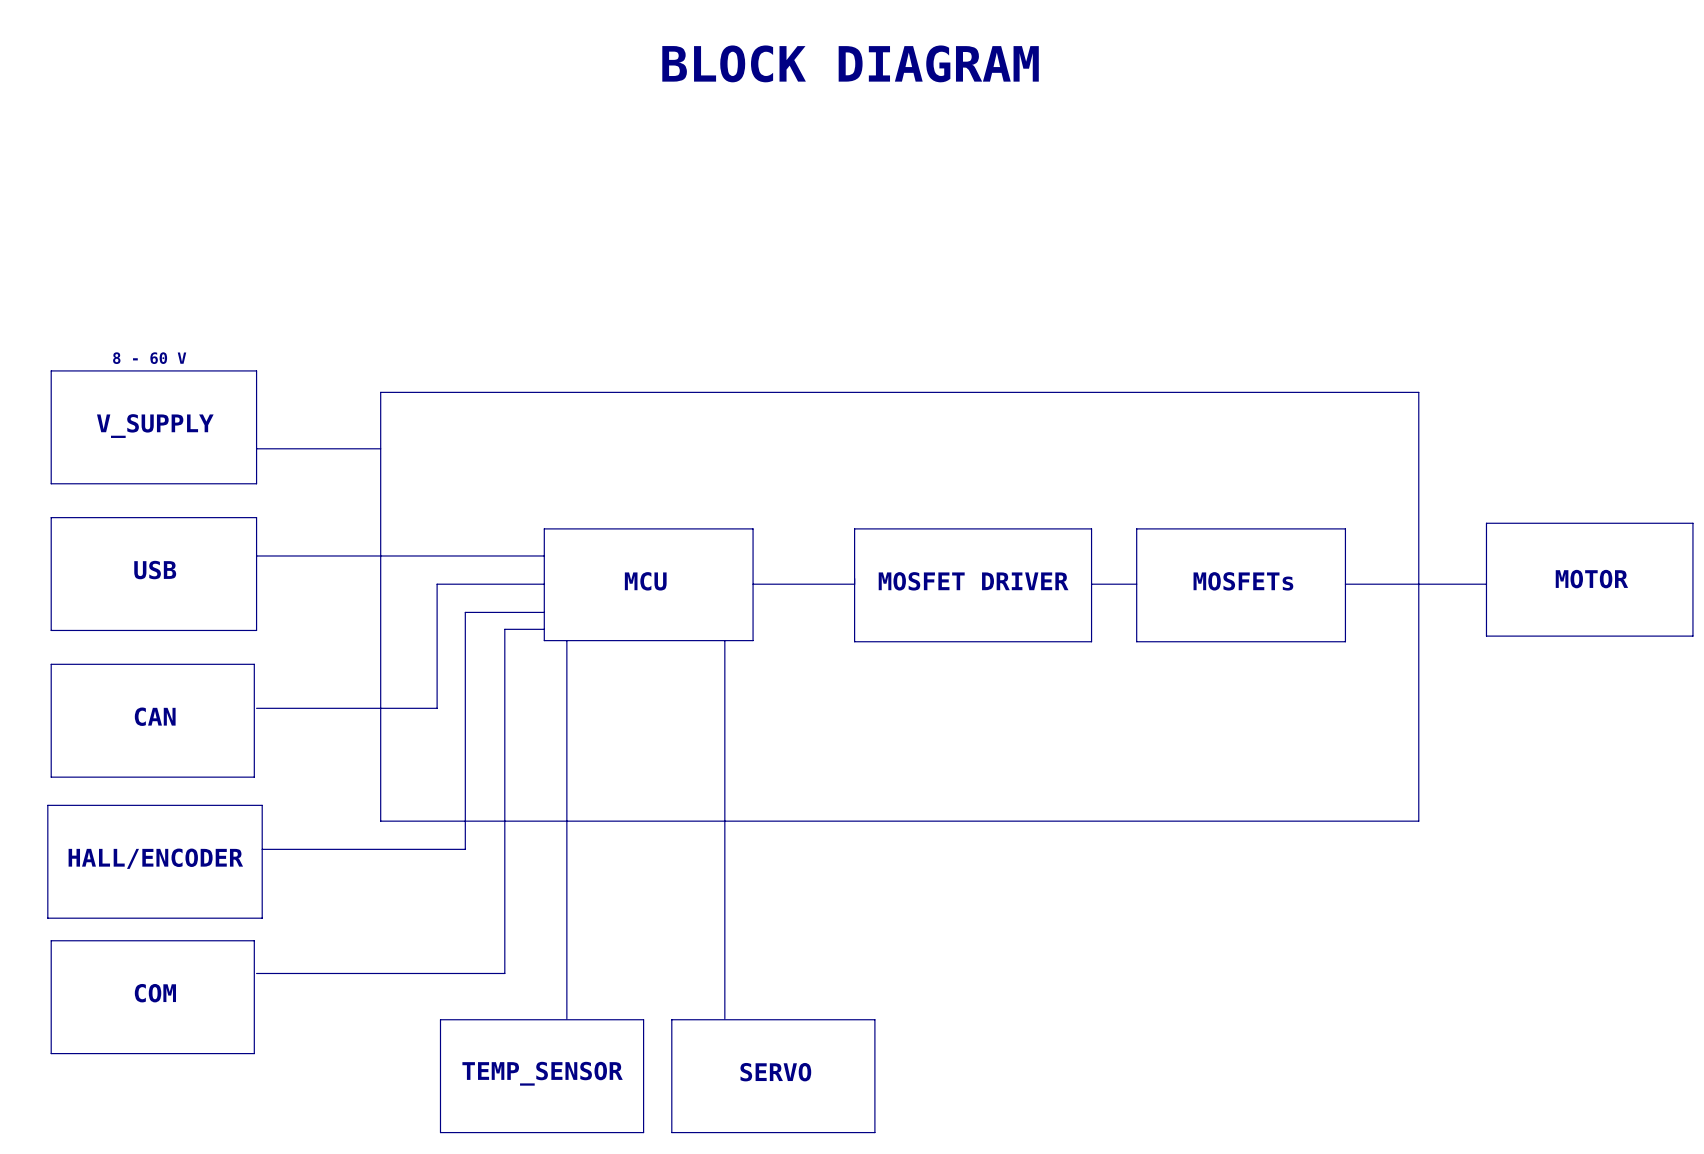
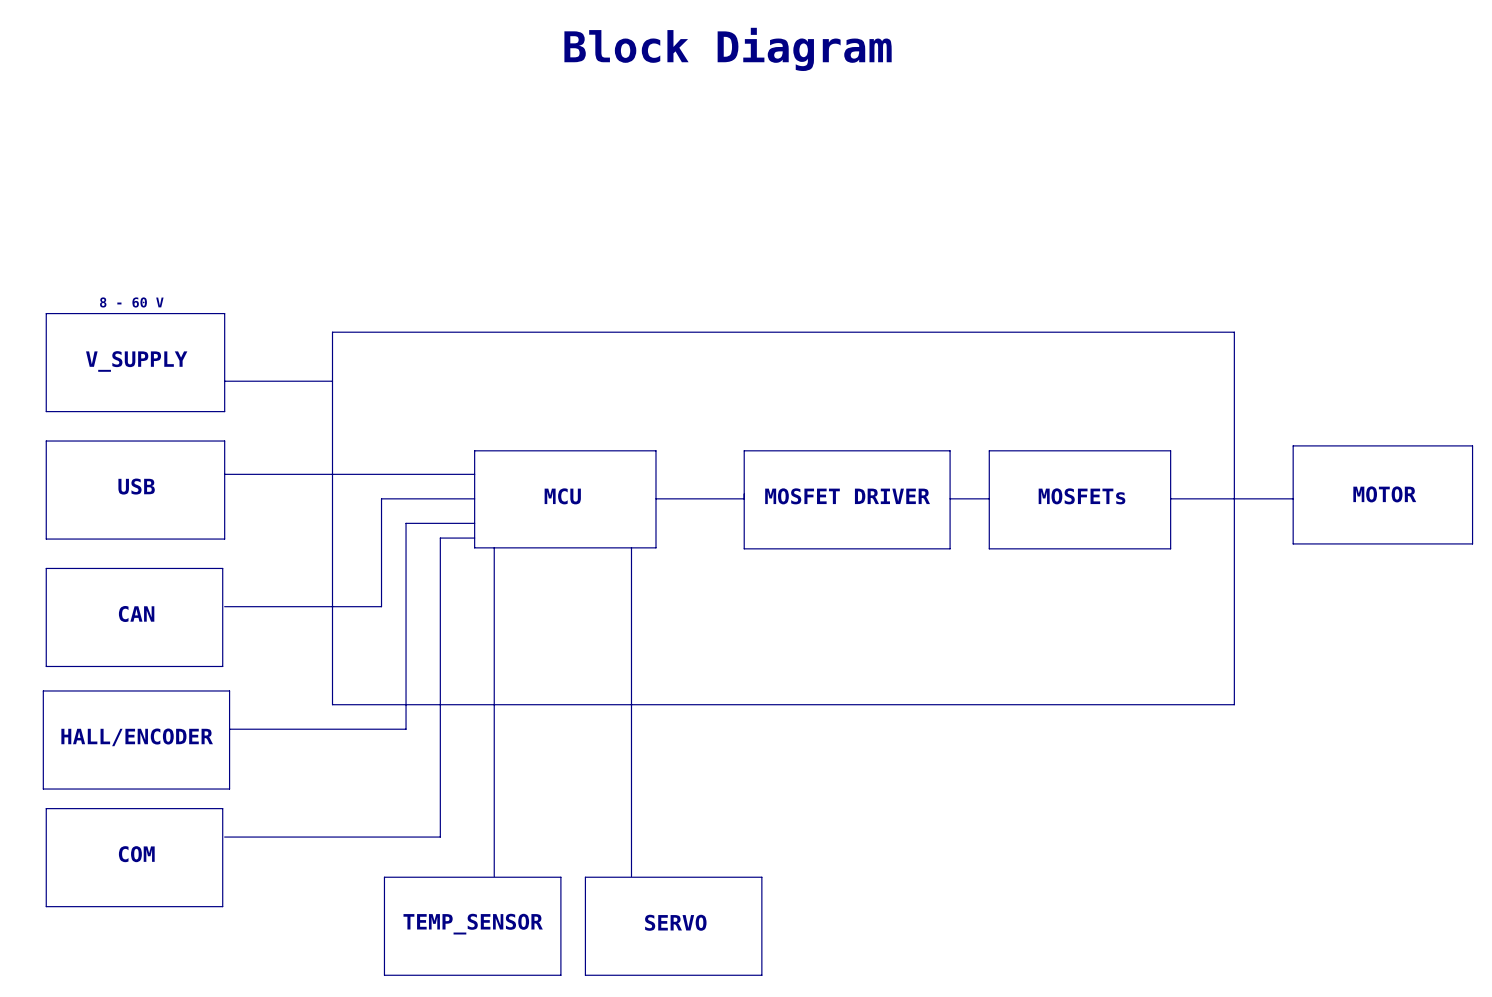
text: BLOCK DIAGRAM (850, 63) -> Block Diagram (728, 49)

